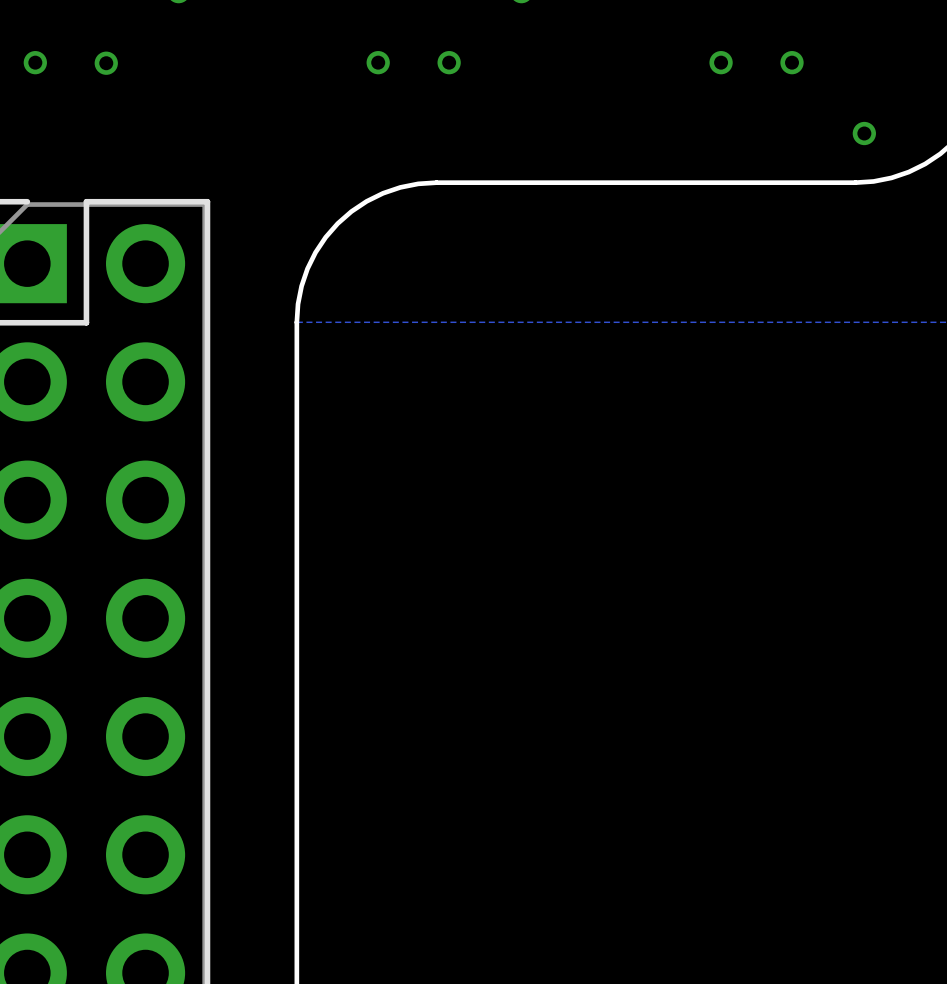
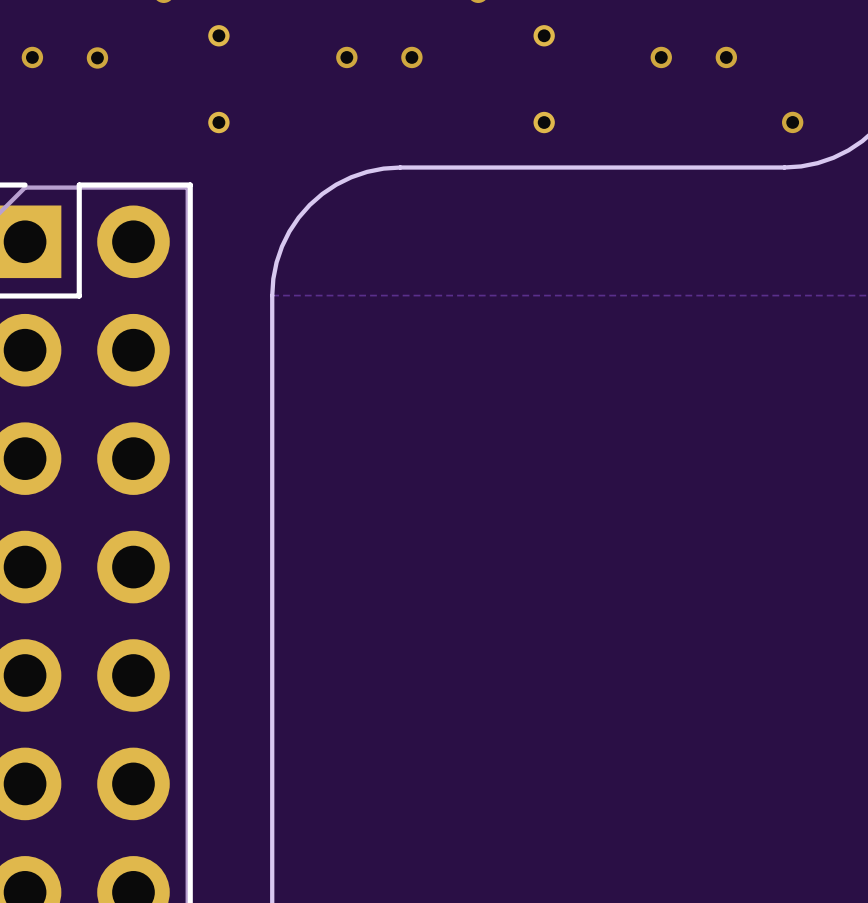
part: none -> (218, 35)
part: none -> (544, 35)
part: none -> (218, 122)
part: none -> (544, 122)

